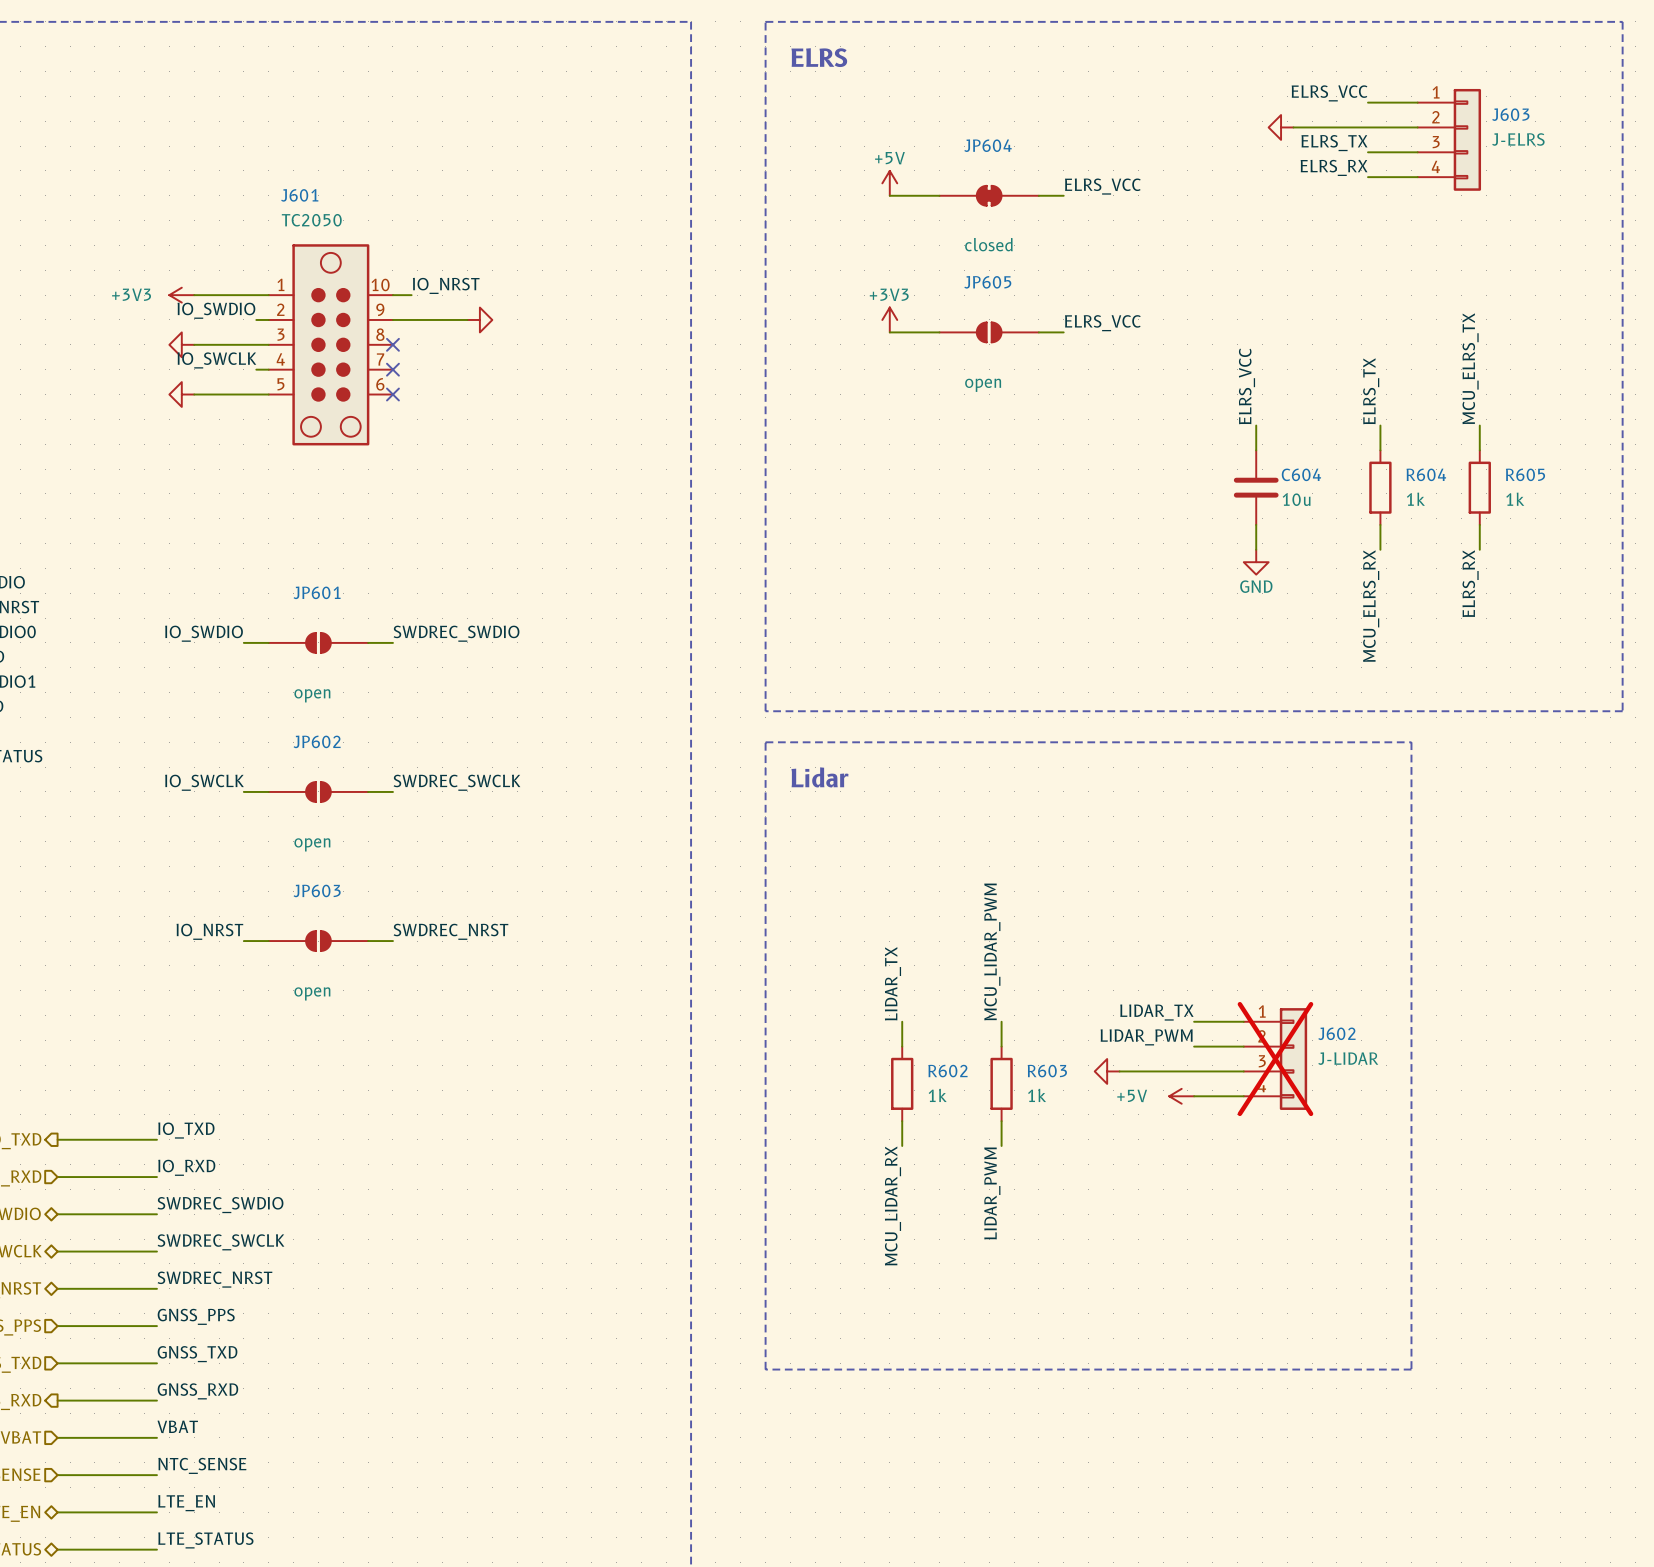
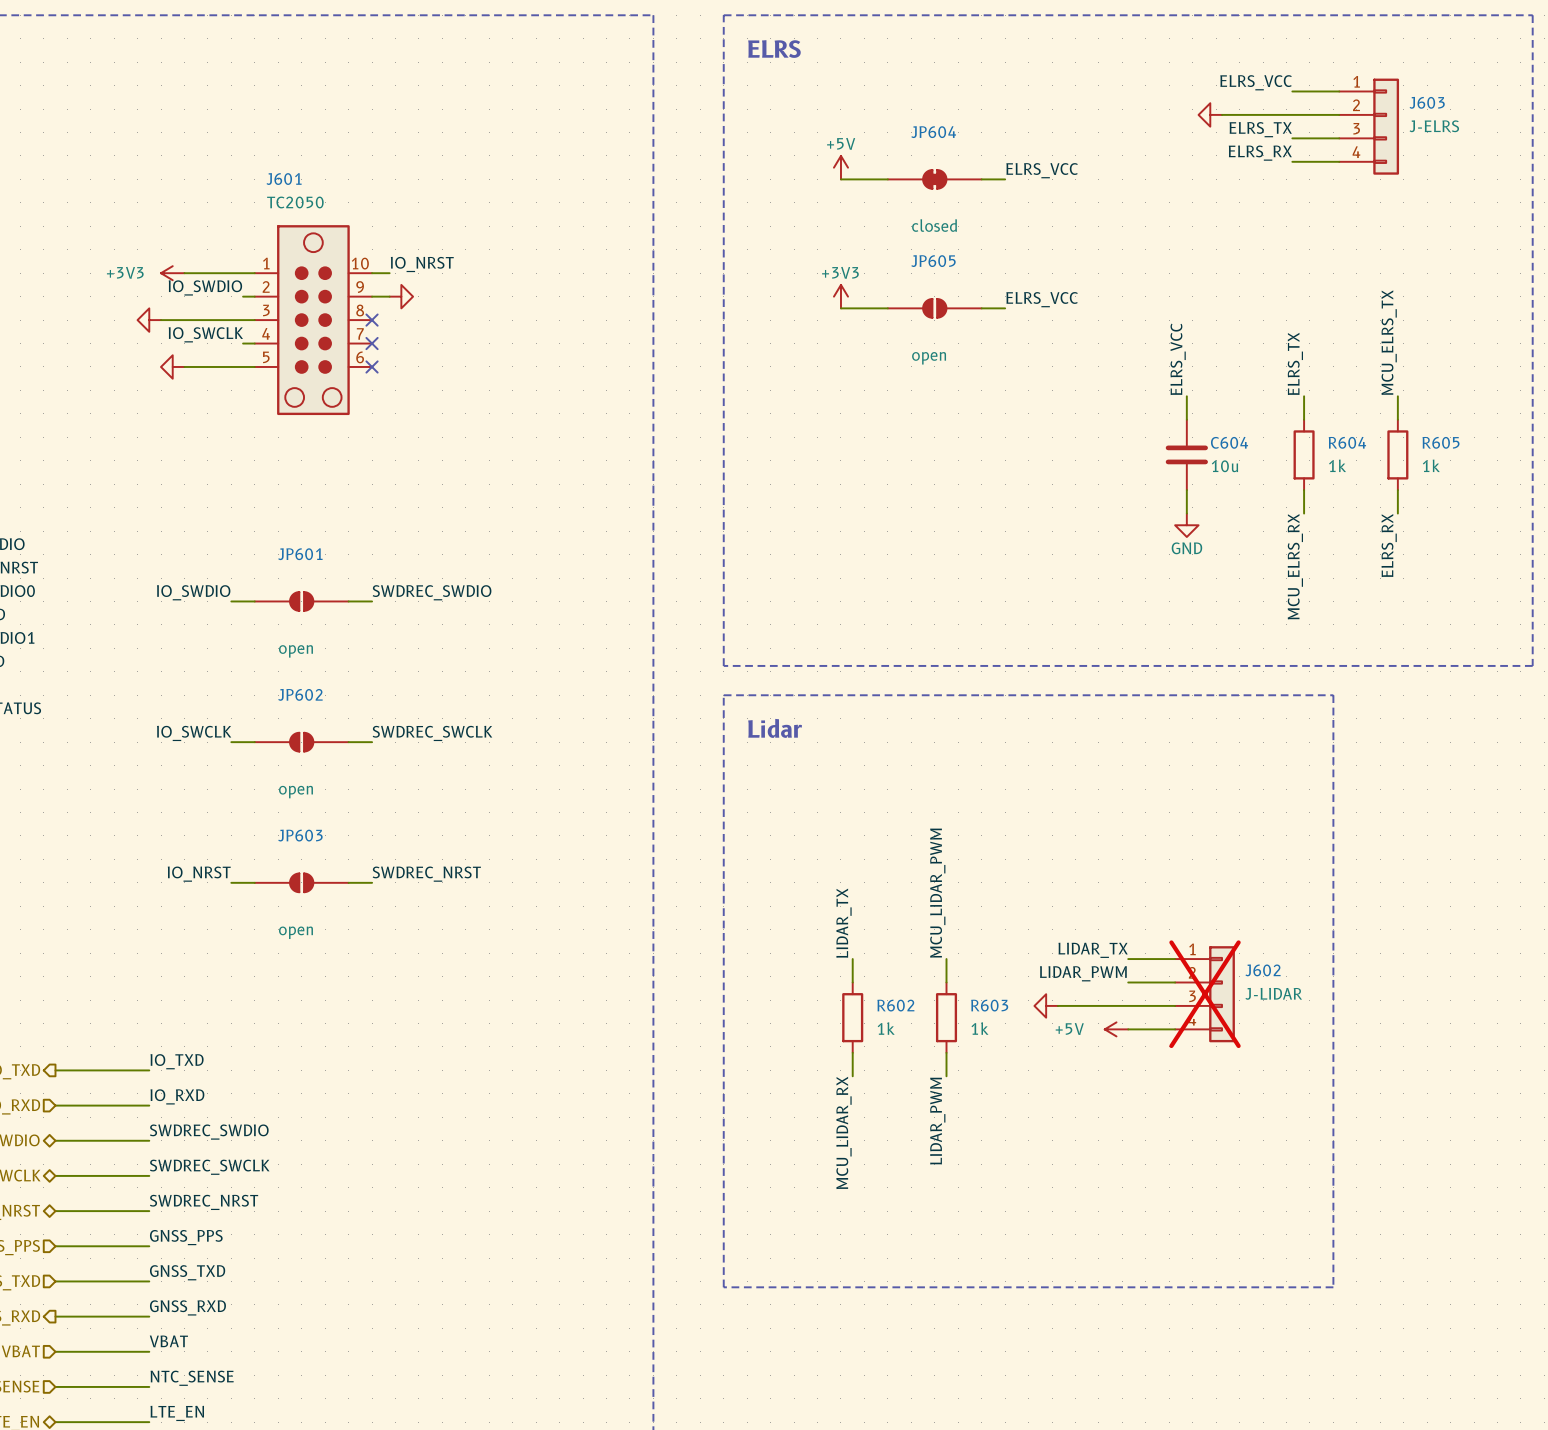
wire: (411, 319) (467, 319) -> none
power symbol position: (479, 319) -> (401, 296)
power symbol position: (181, 344) -> (149, 320)

